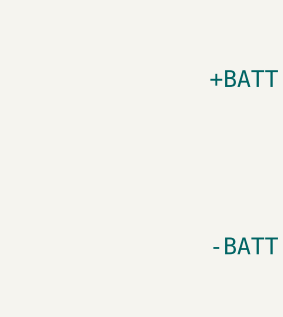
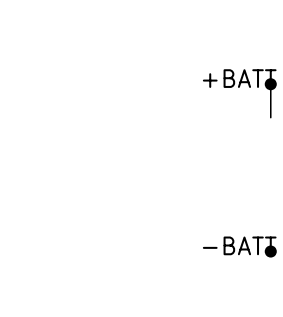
wire: none -> (270, 84) (270, 117)
junction: none -> (270, 84)
junction: none -> (270, 251)

